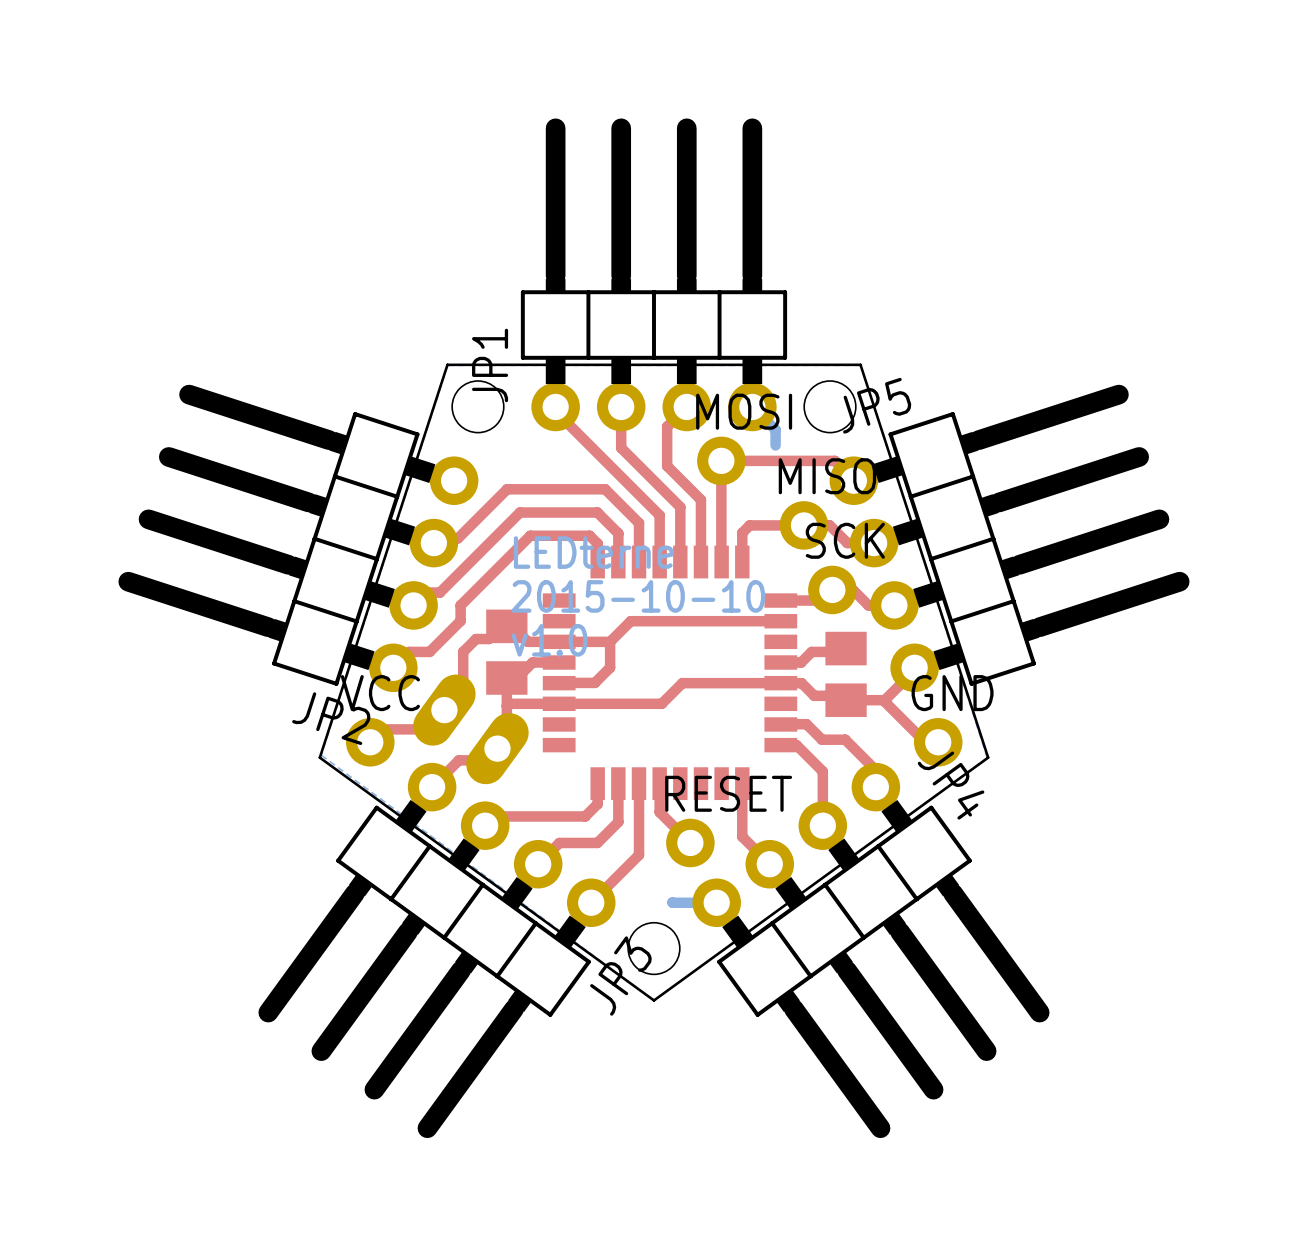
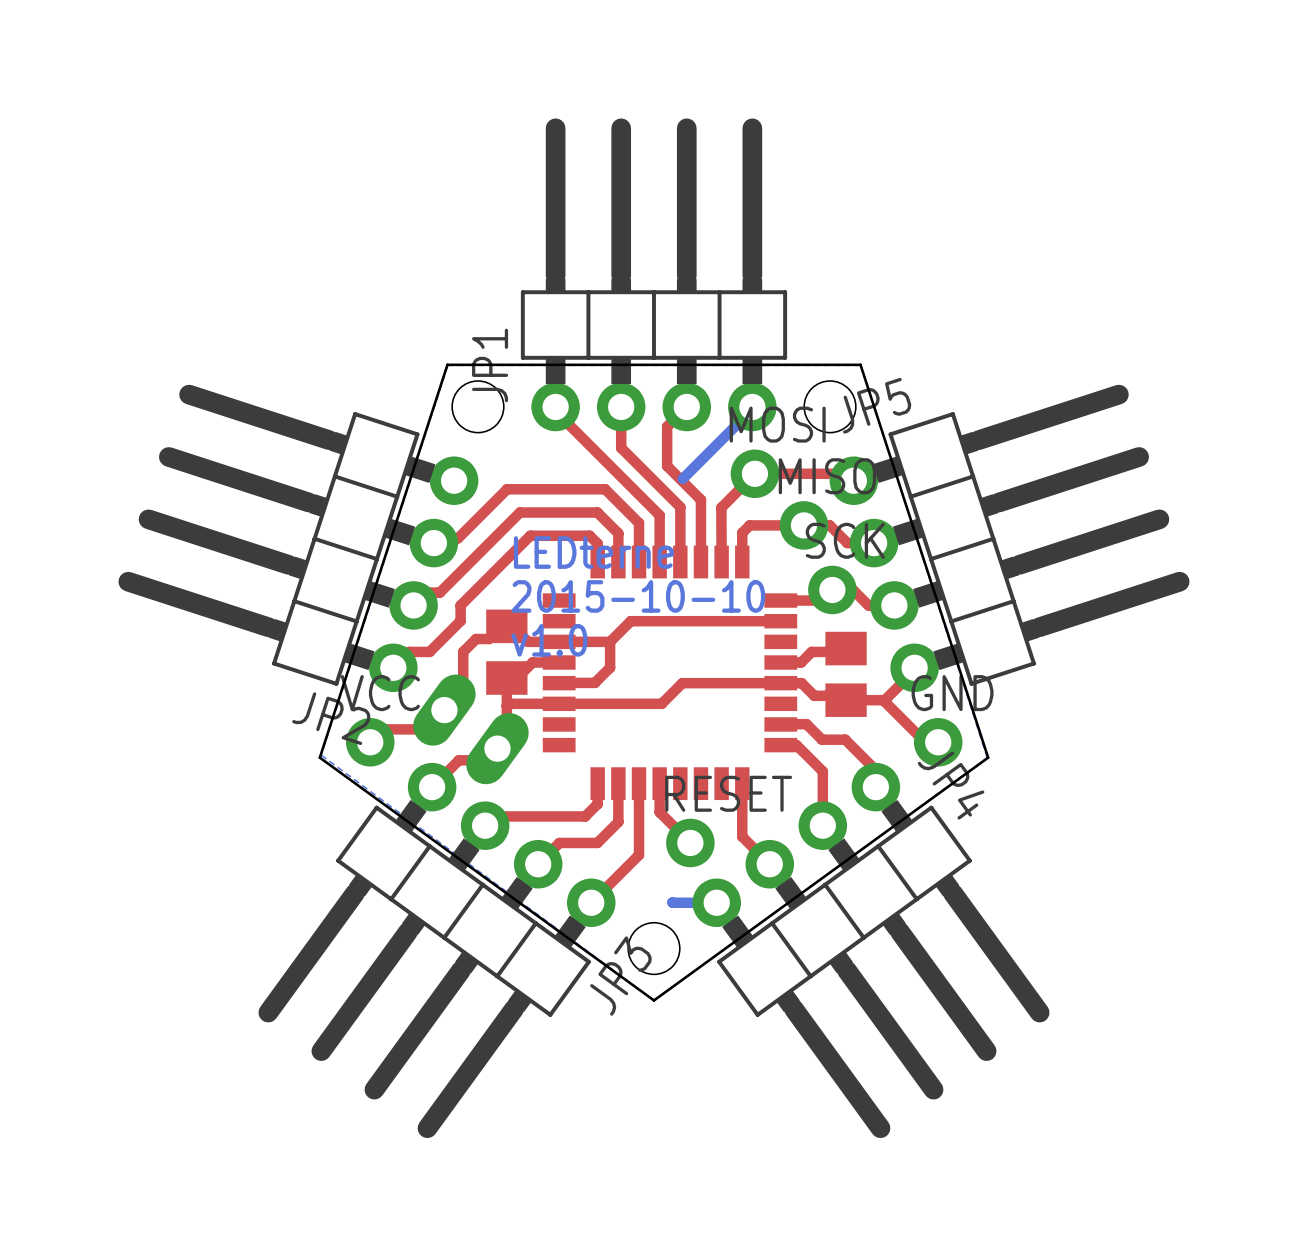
bottom track: (752, 406) (775, 429) (775, 445) -> (752, 406) (752, 409) (682, 478)
MOSI position: (721, 460) -> (754, 473)
top track: (853, 480) (834, 460) (721, 460) (721, 562) -> (853, 480) (846, 473) (754, 473) (721, 507) (721, 562)

